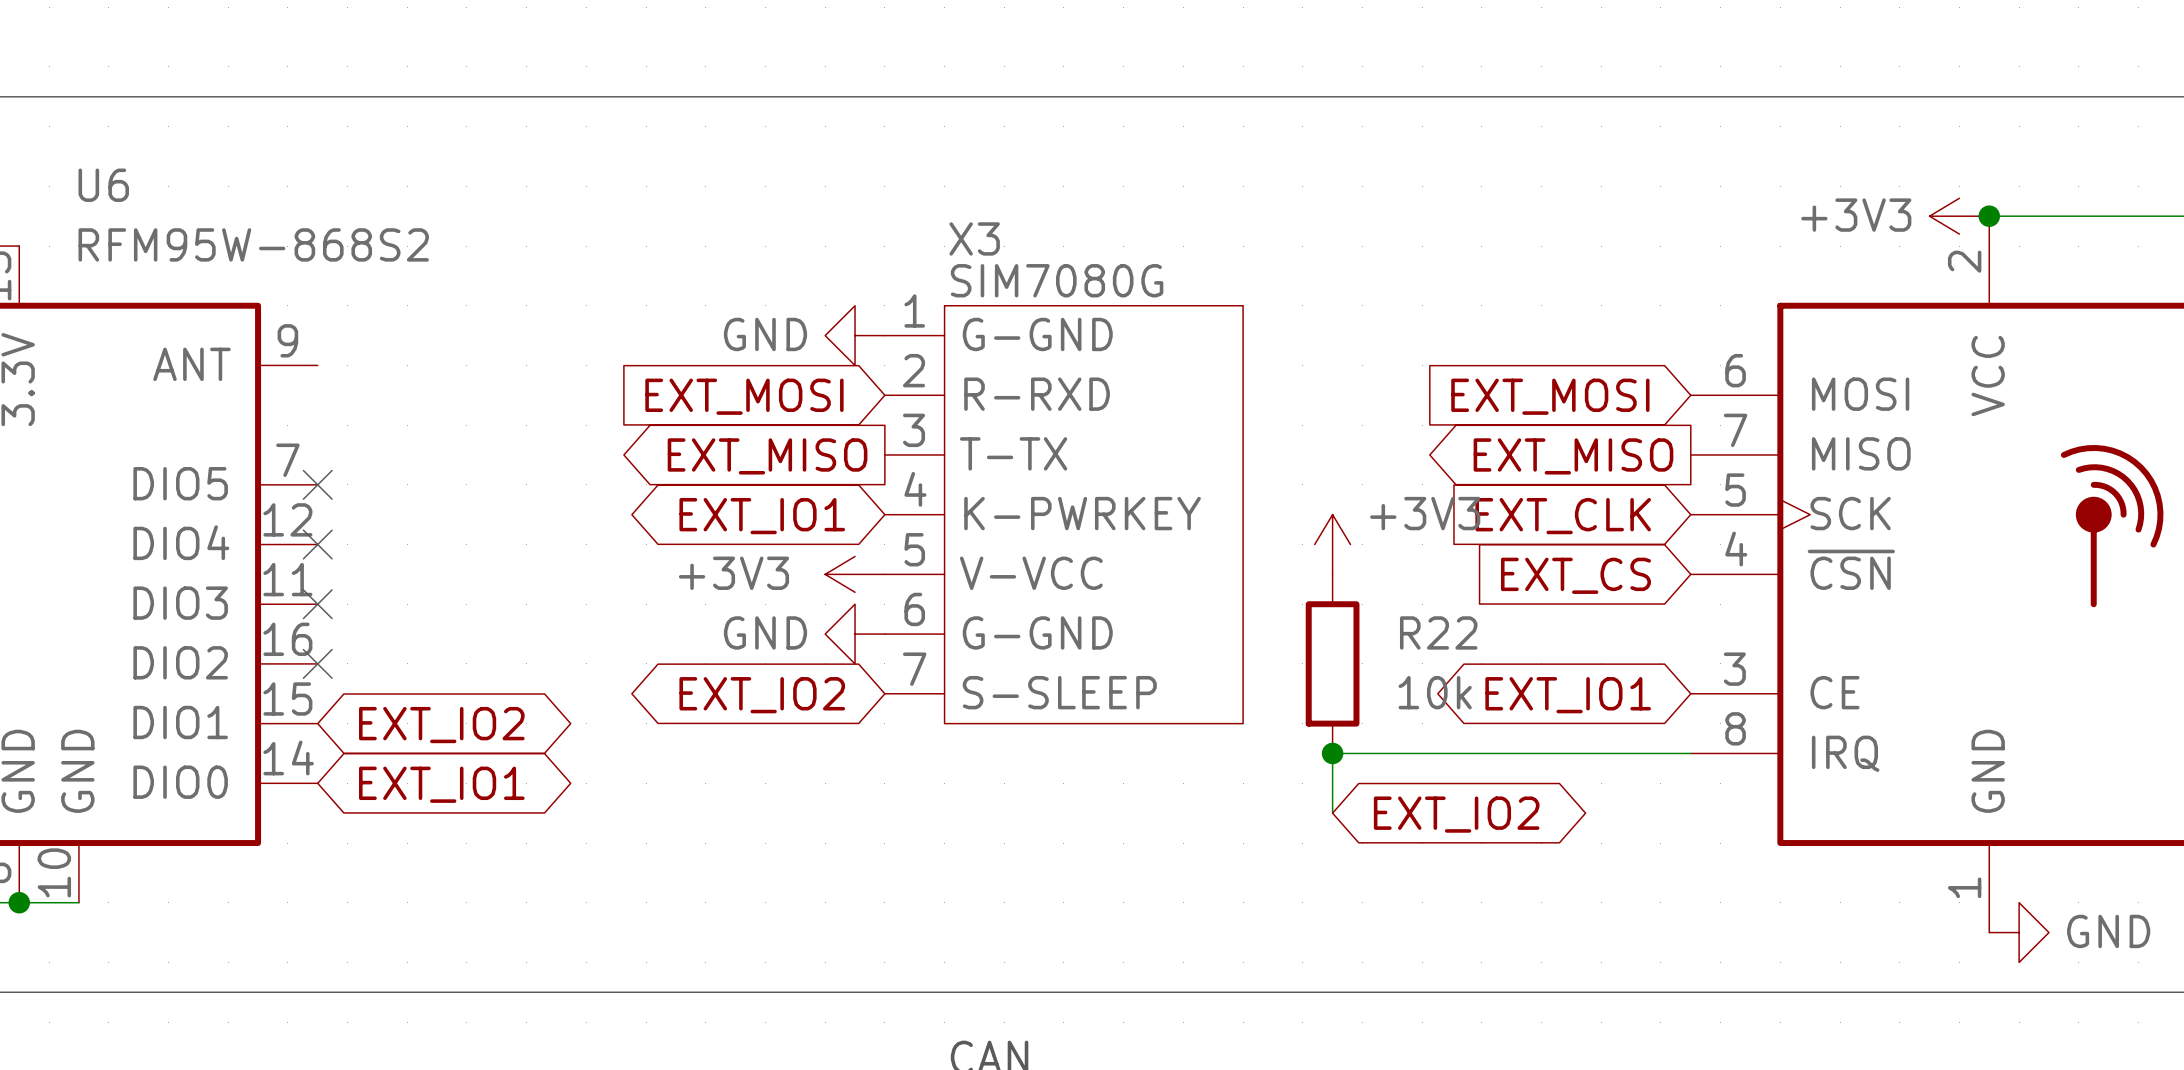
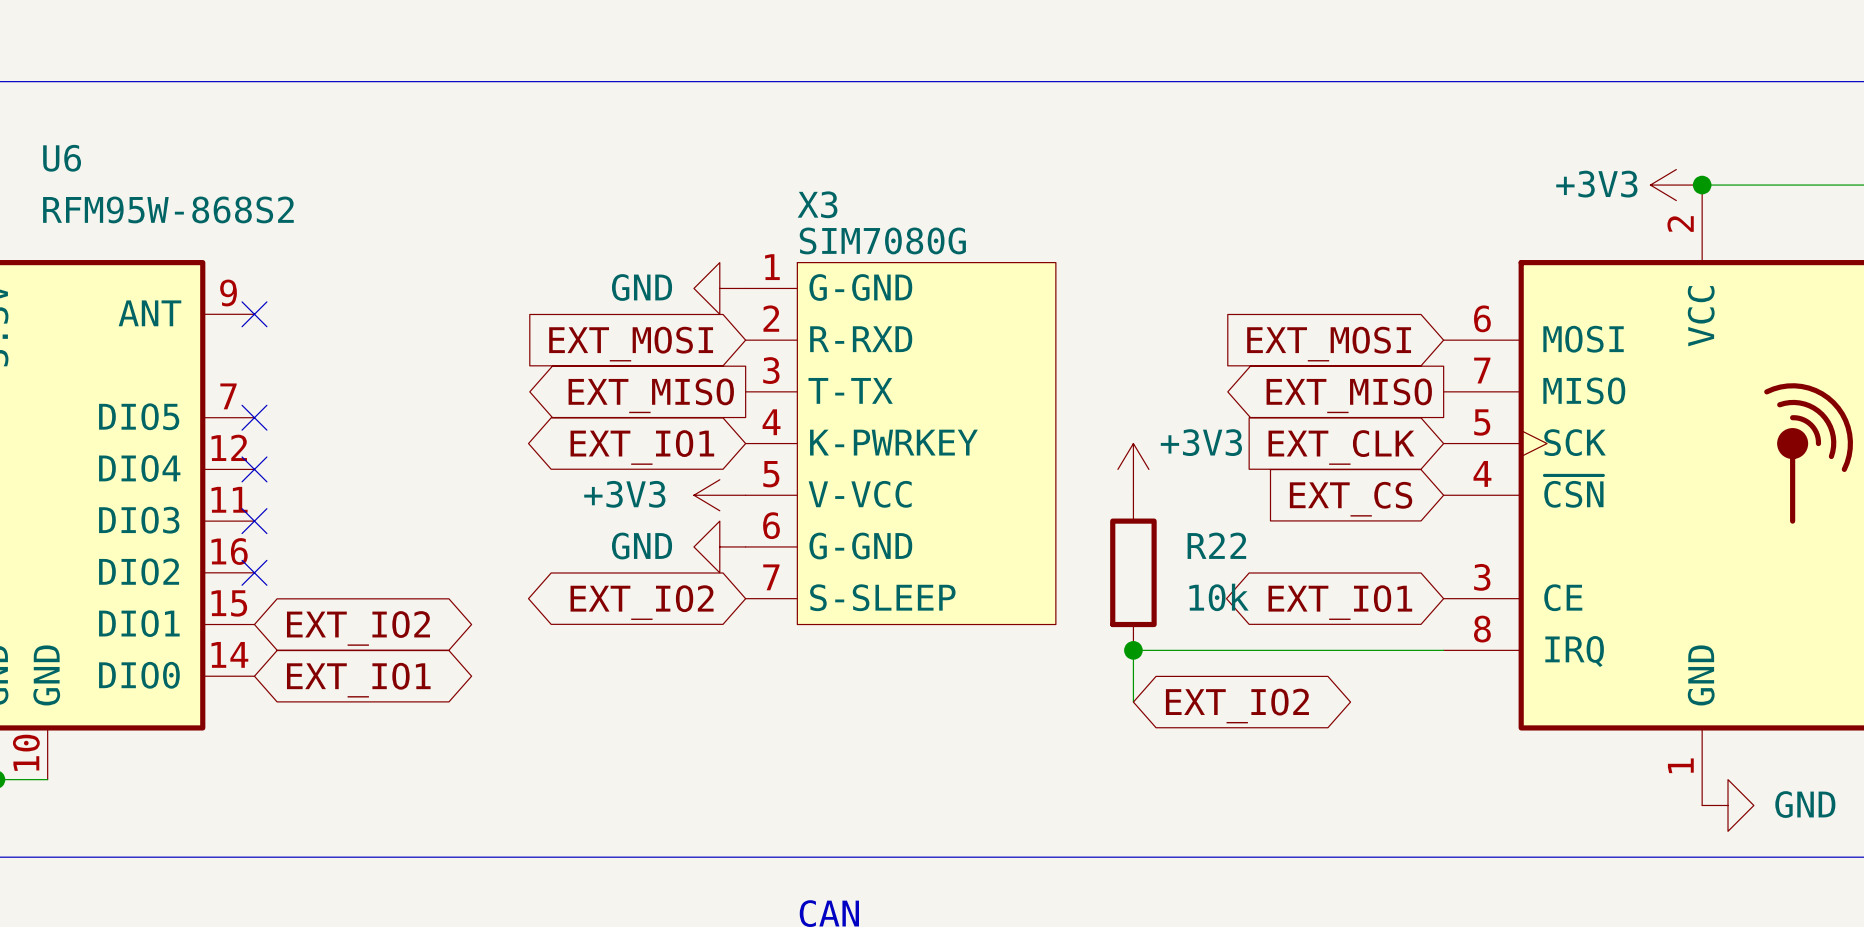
no-connect mark: none -> (254, 314)

